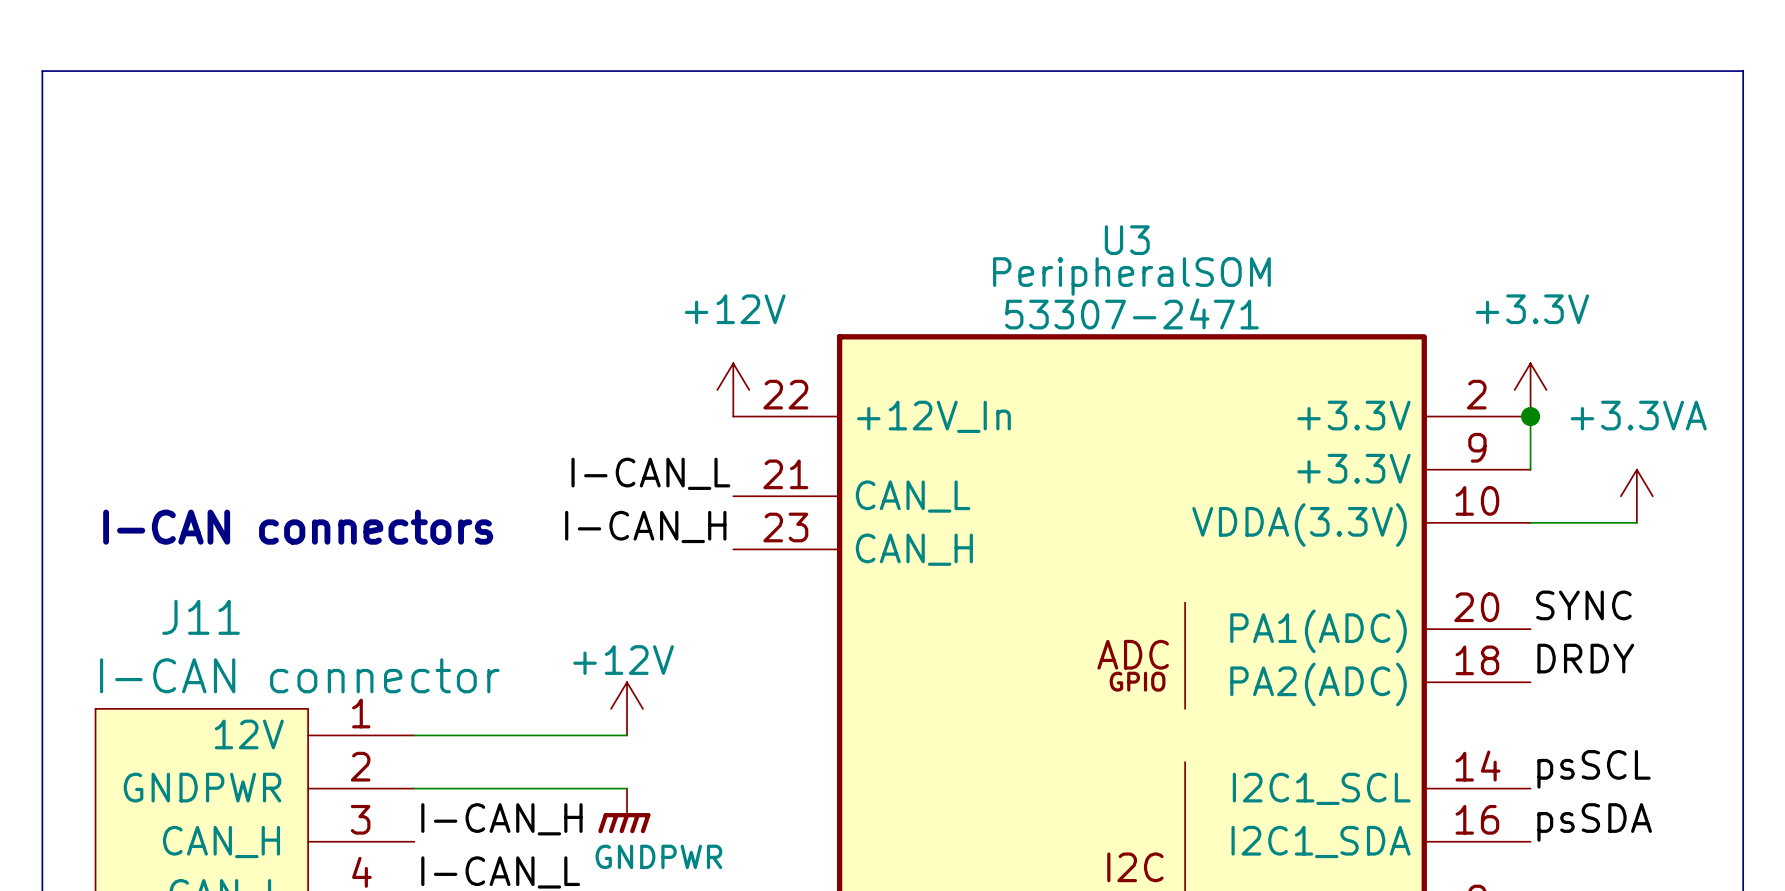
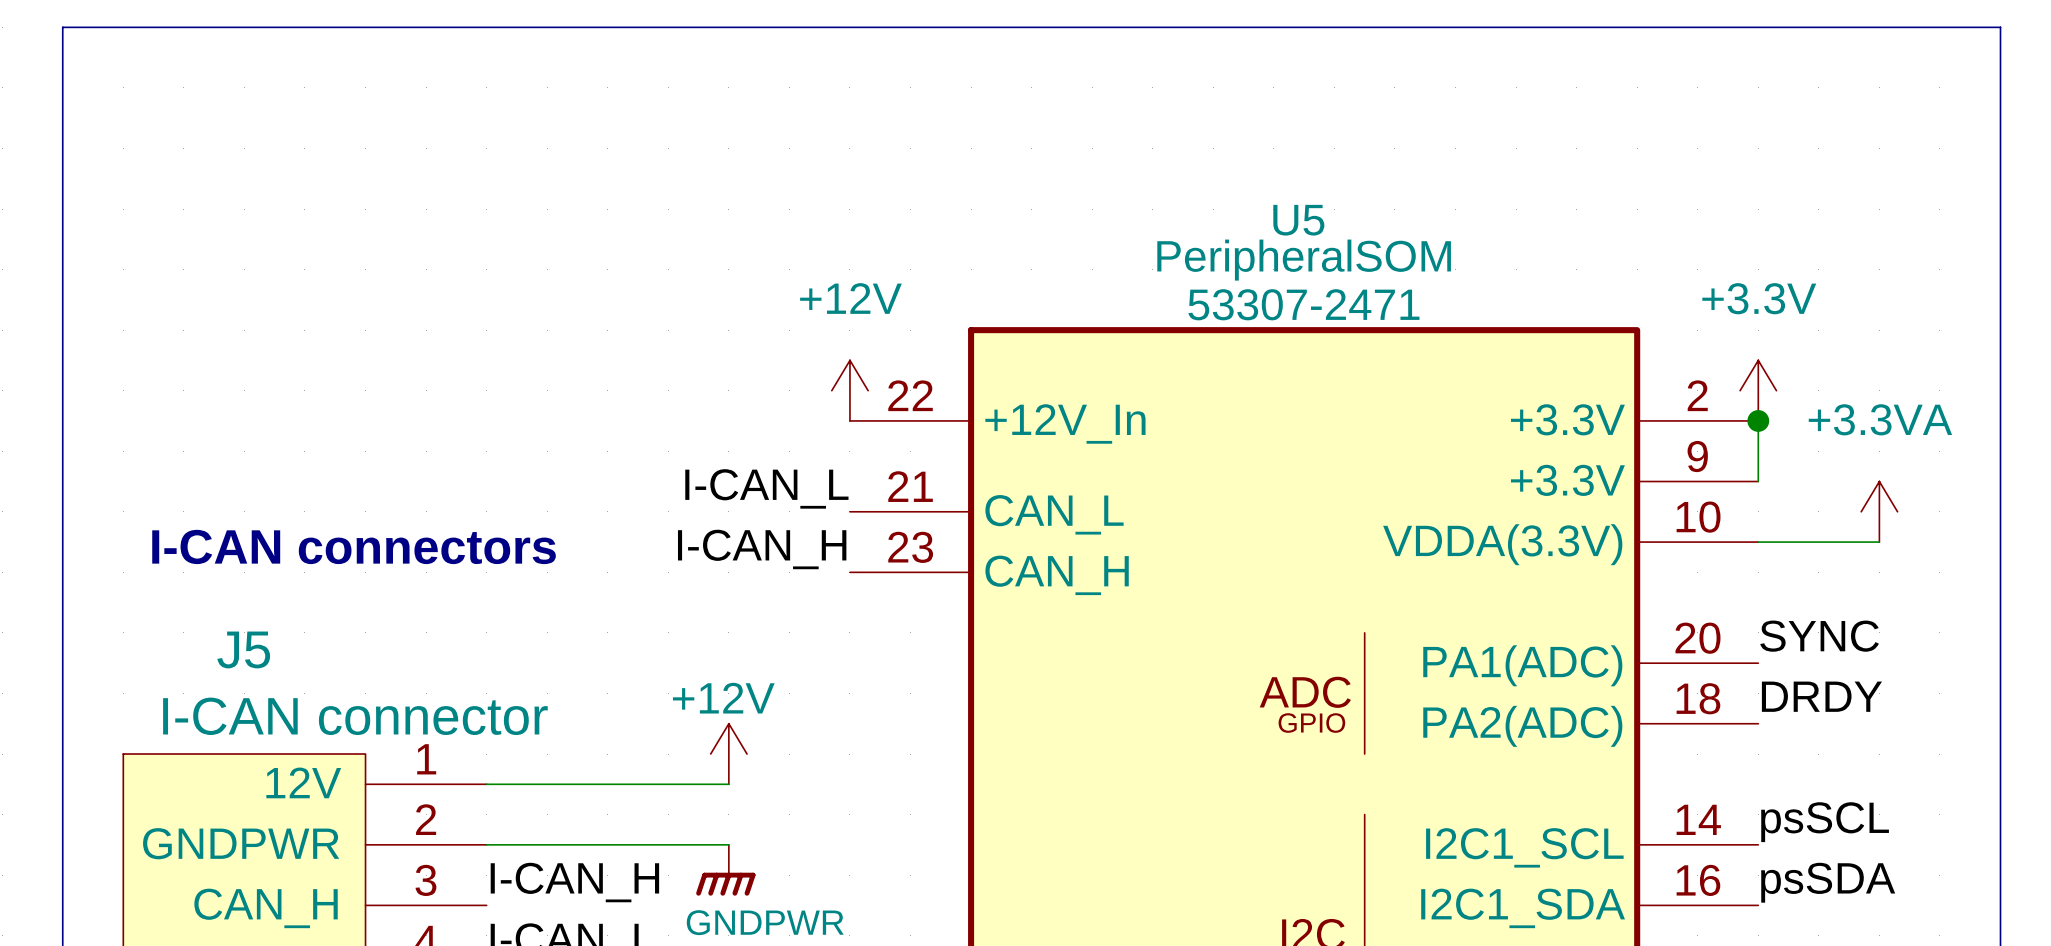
U3 name: U3 (1127, 240) -> U5 (1298, 220)
J11 name: J11 (201, 617) -> J5 (243, 649)

